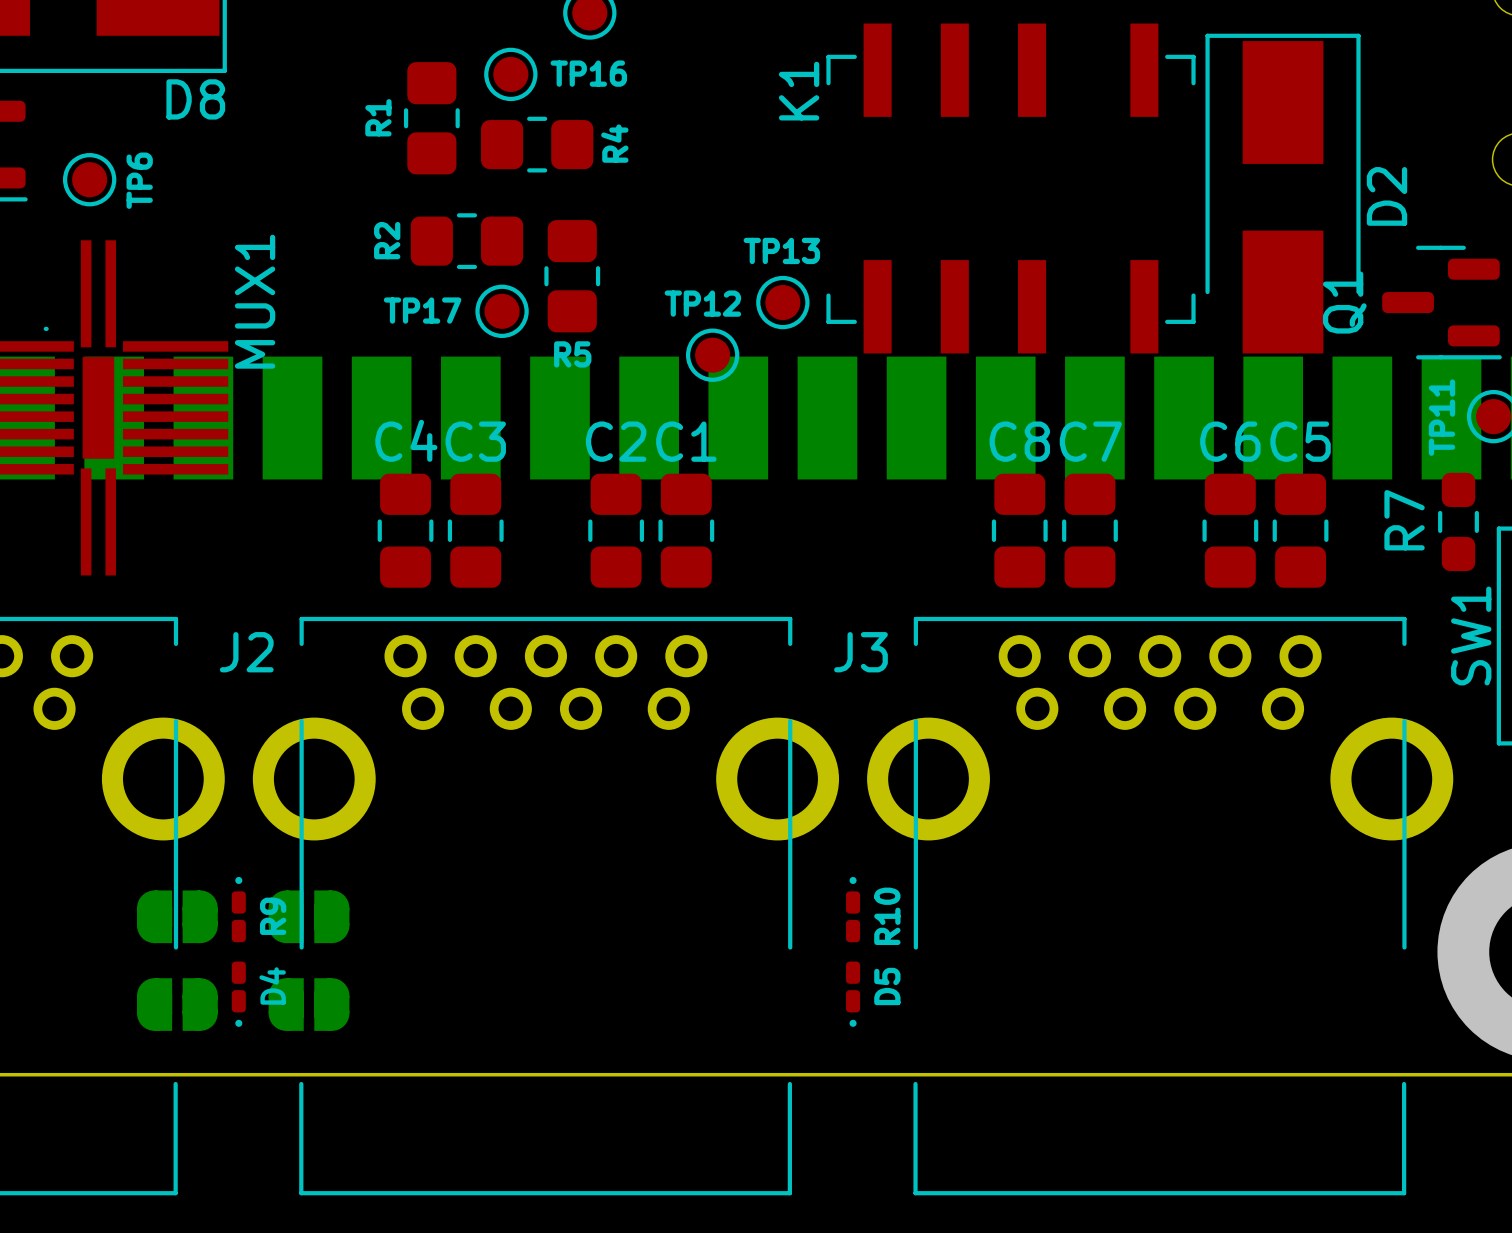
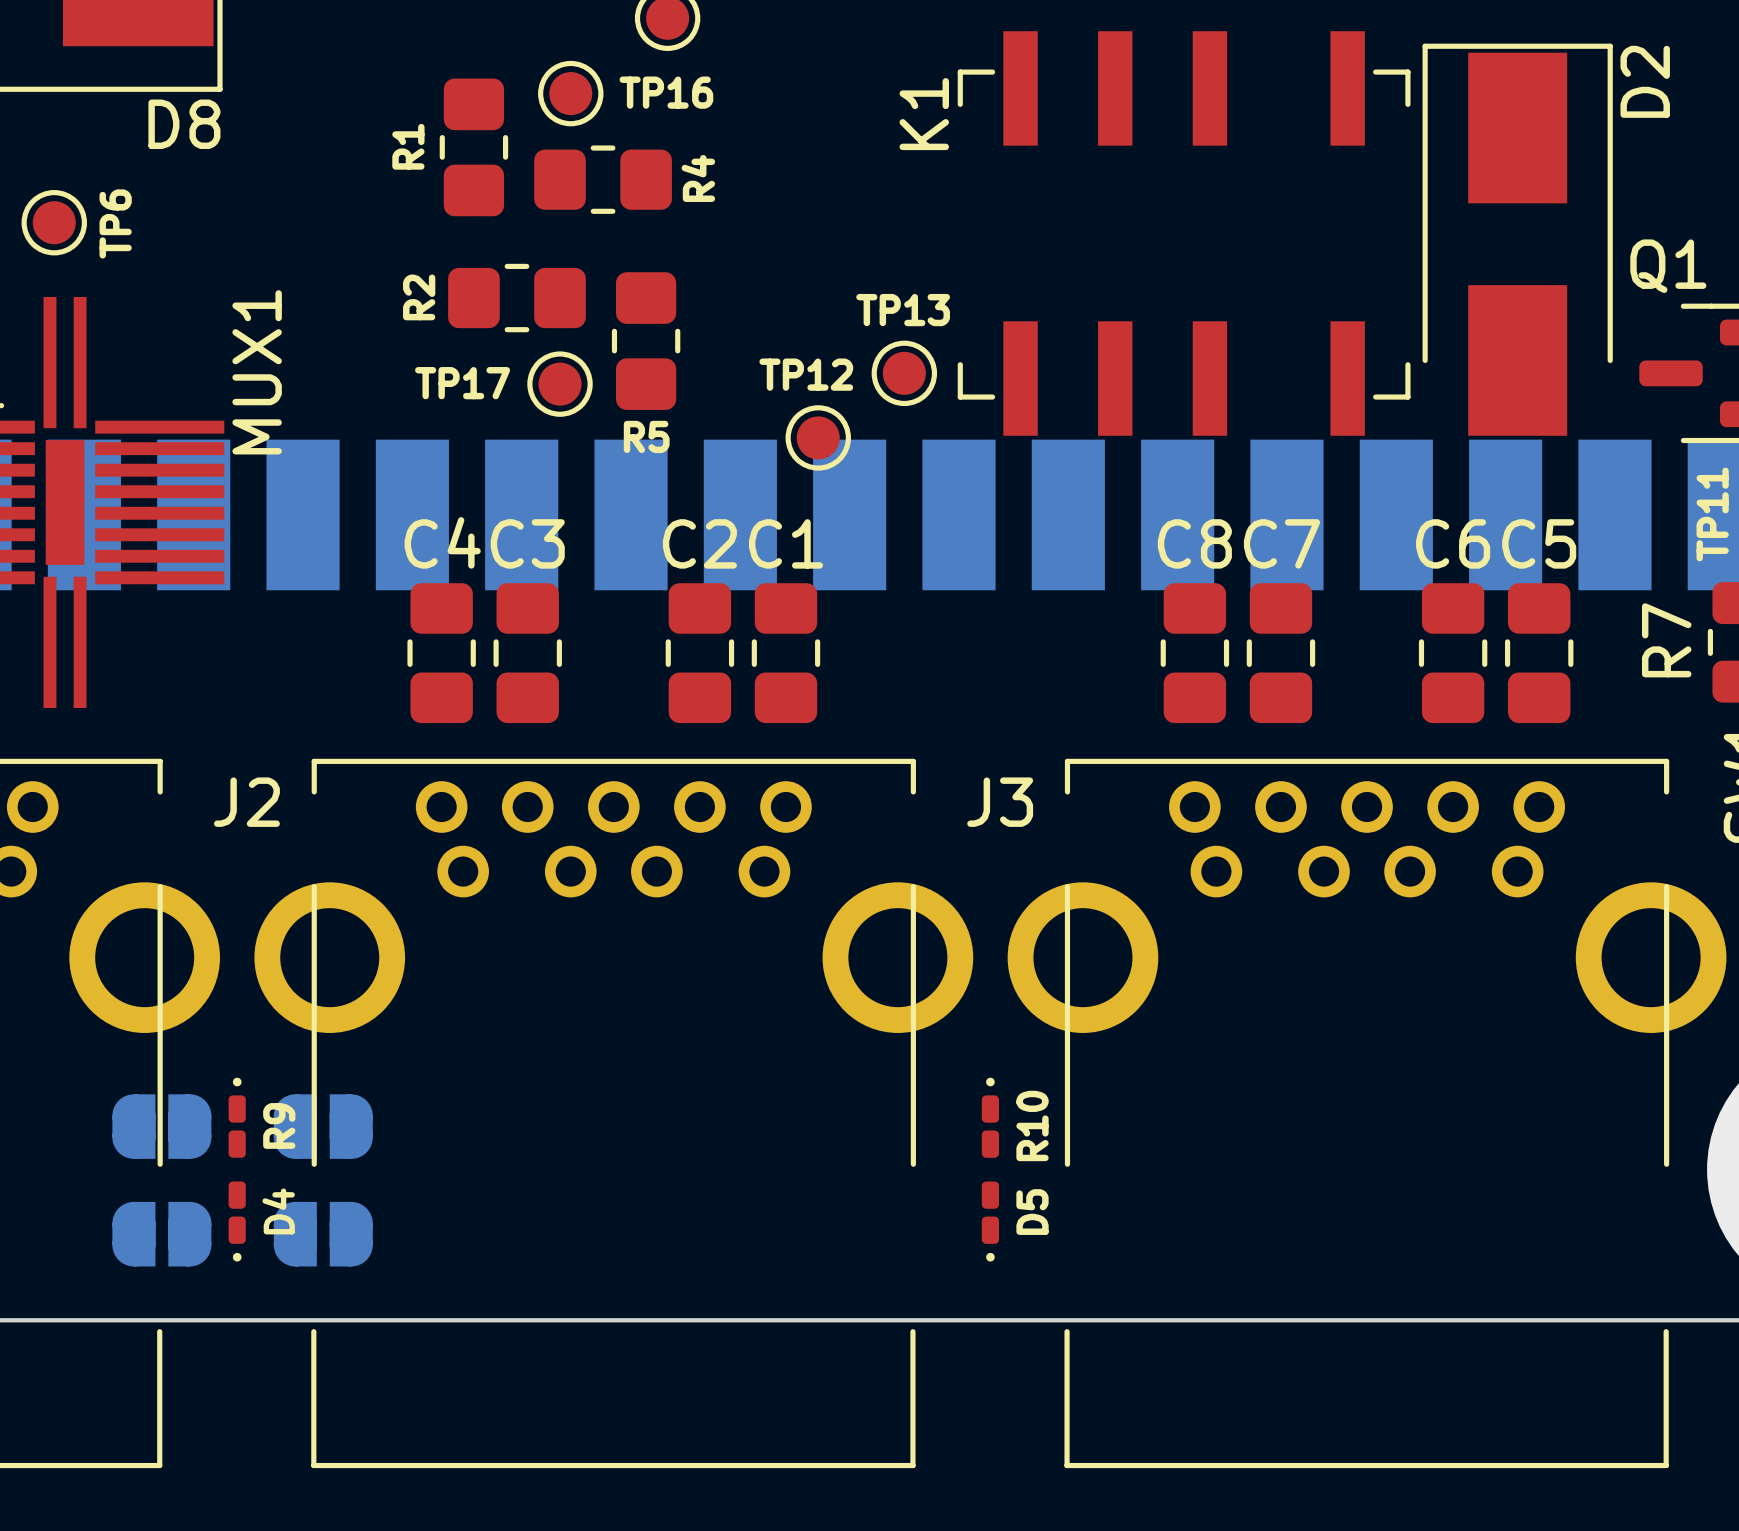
D2 name position: D2 (1387, 196) -> D2 (1645, 81)
Q1 name rotation: 0° (1344, 302) -> 90° clockwise (1668, 266)
Q1 name position: Q1 (1344, 302) -> Q1 (1668, 266)

